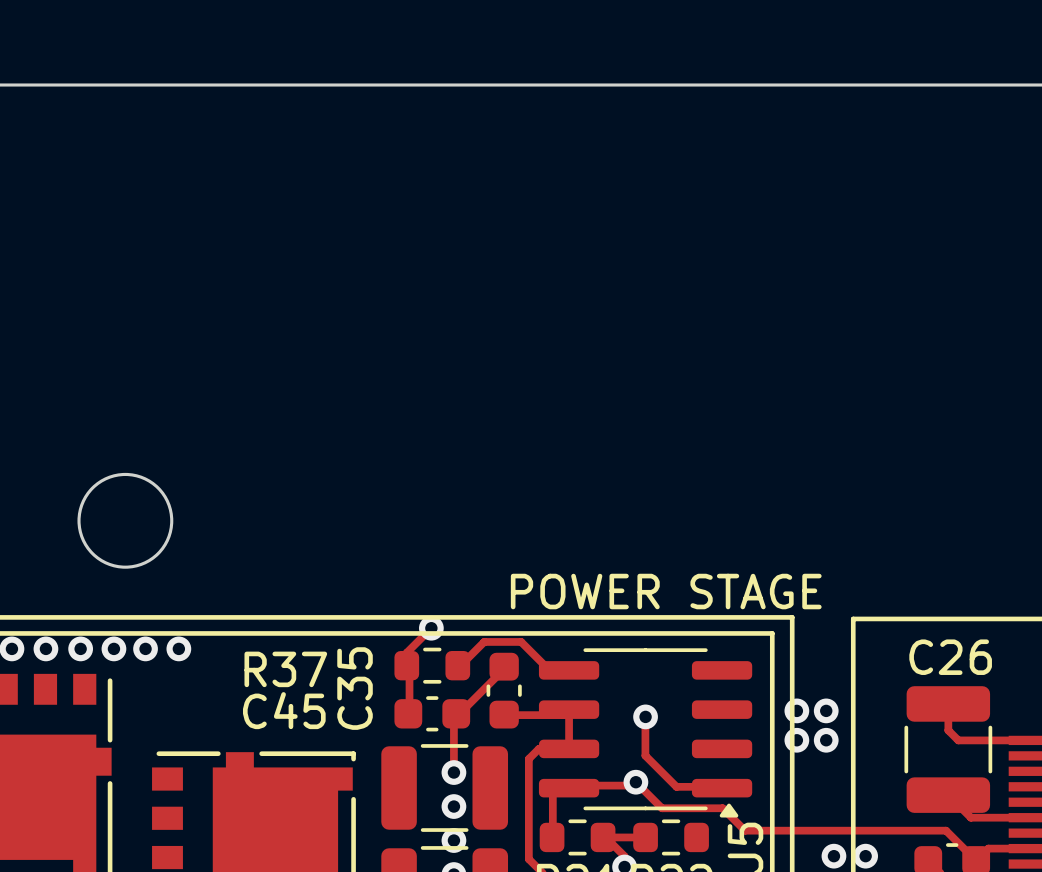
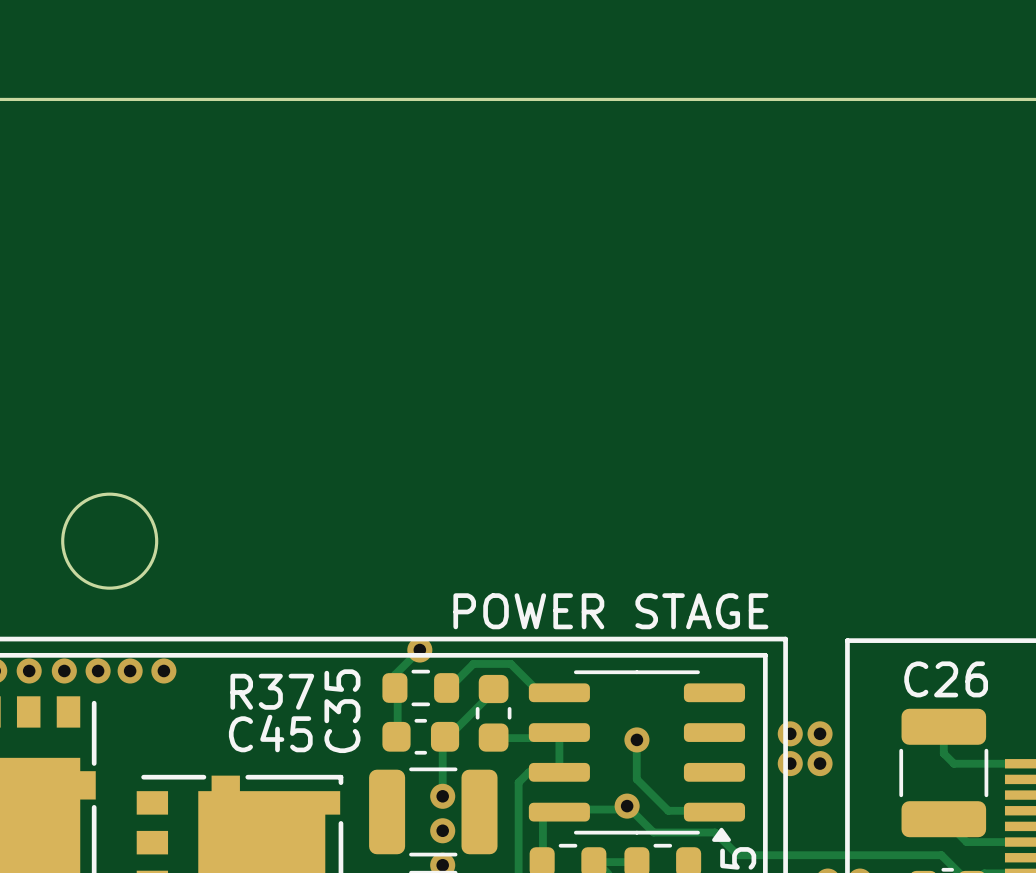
text position: POWER STAGE (666, 591) -> POWER STAGE (610, 611)

